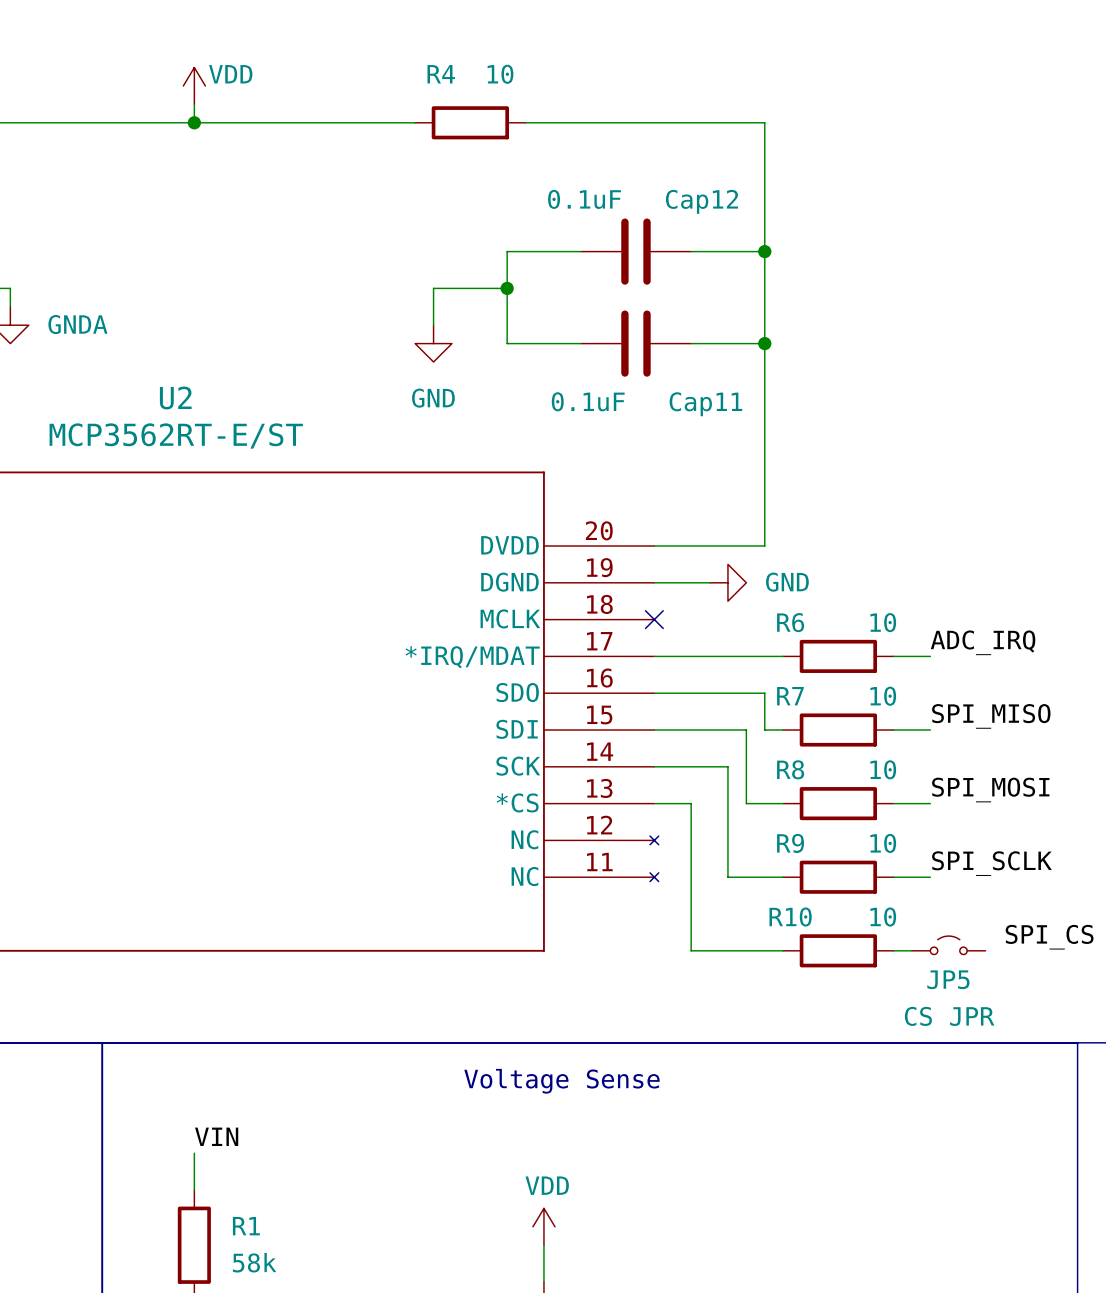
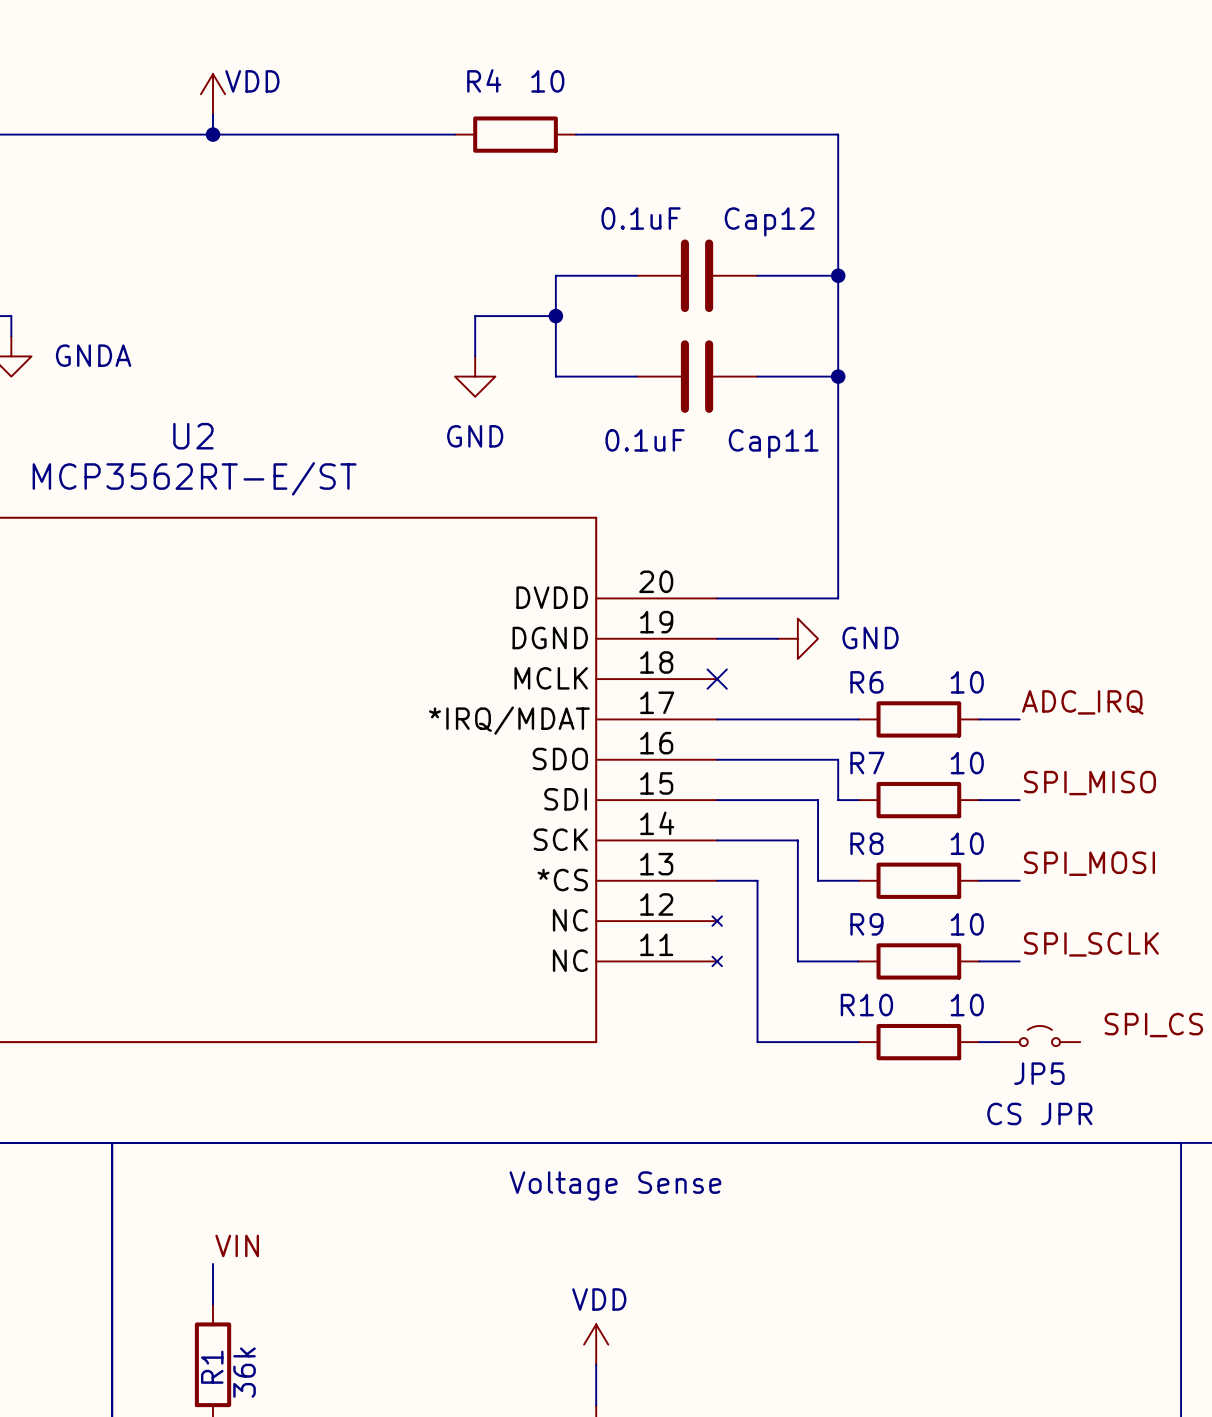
R1 name rotation: 0° (246, 1226) -> 90° counterclockwise (212, 1367)
R1 name position: R1 (246, 1226) -> R1 (212, 1367)
R1 value: 58k (254, 1262) -> 36k (244, 1372)

